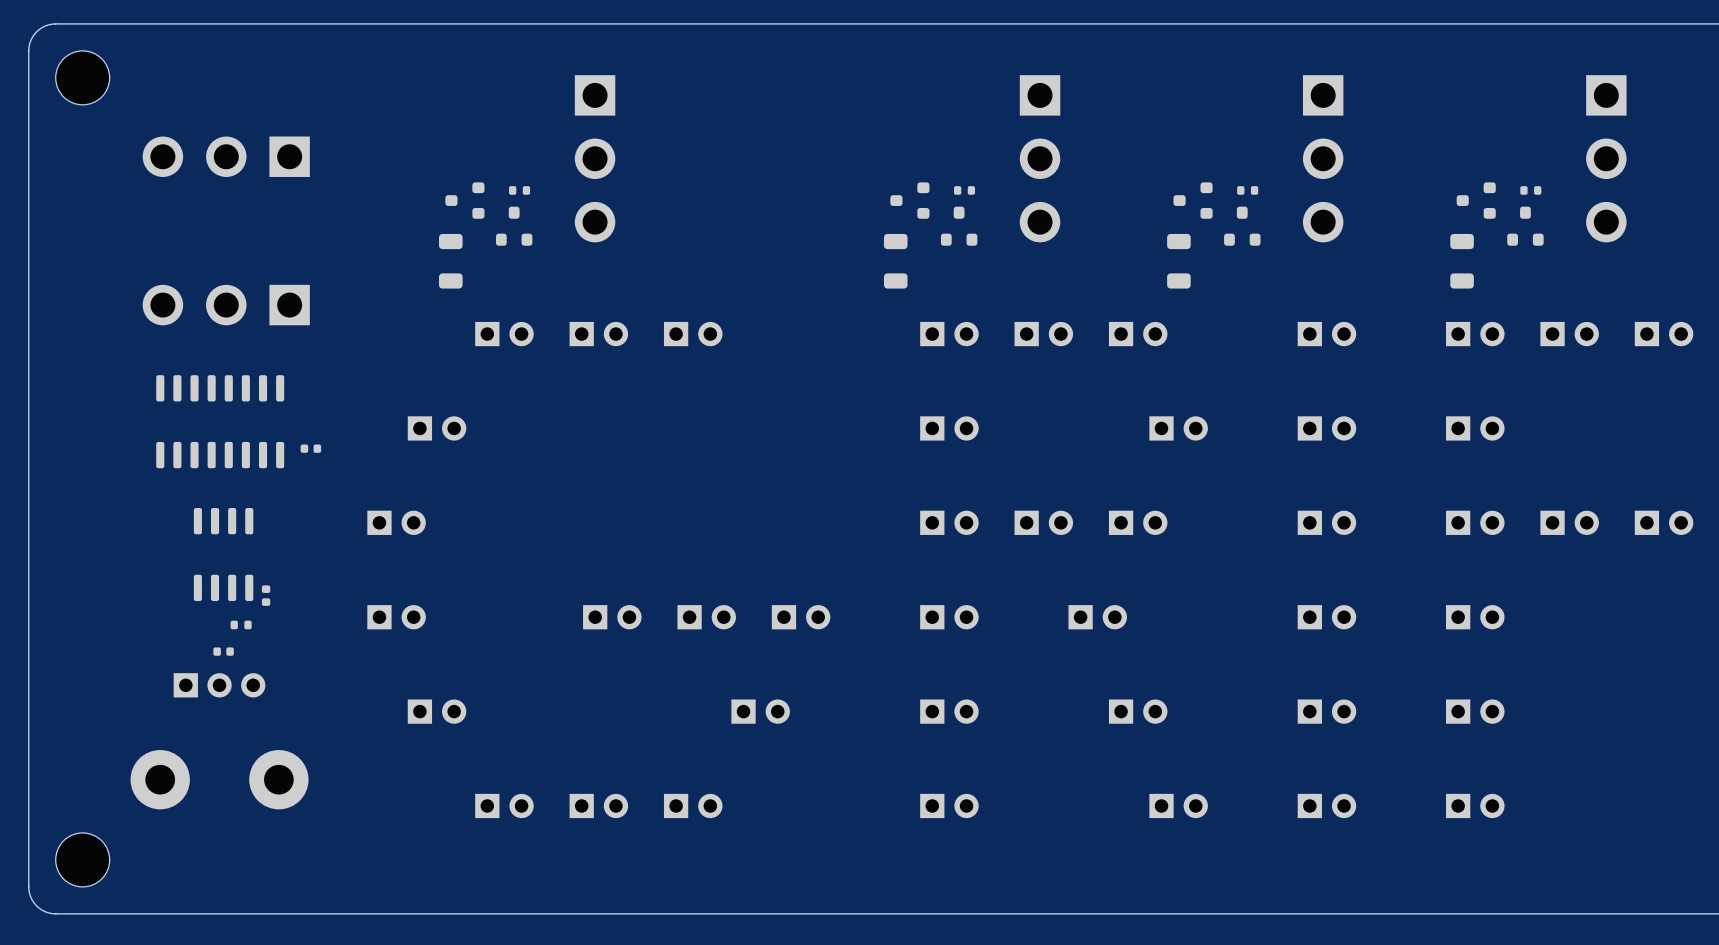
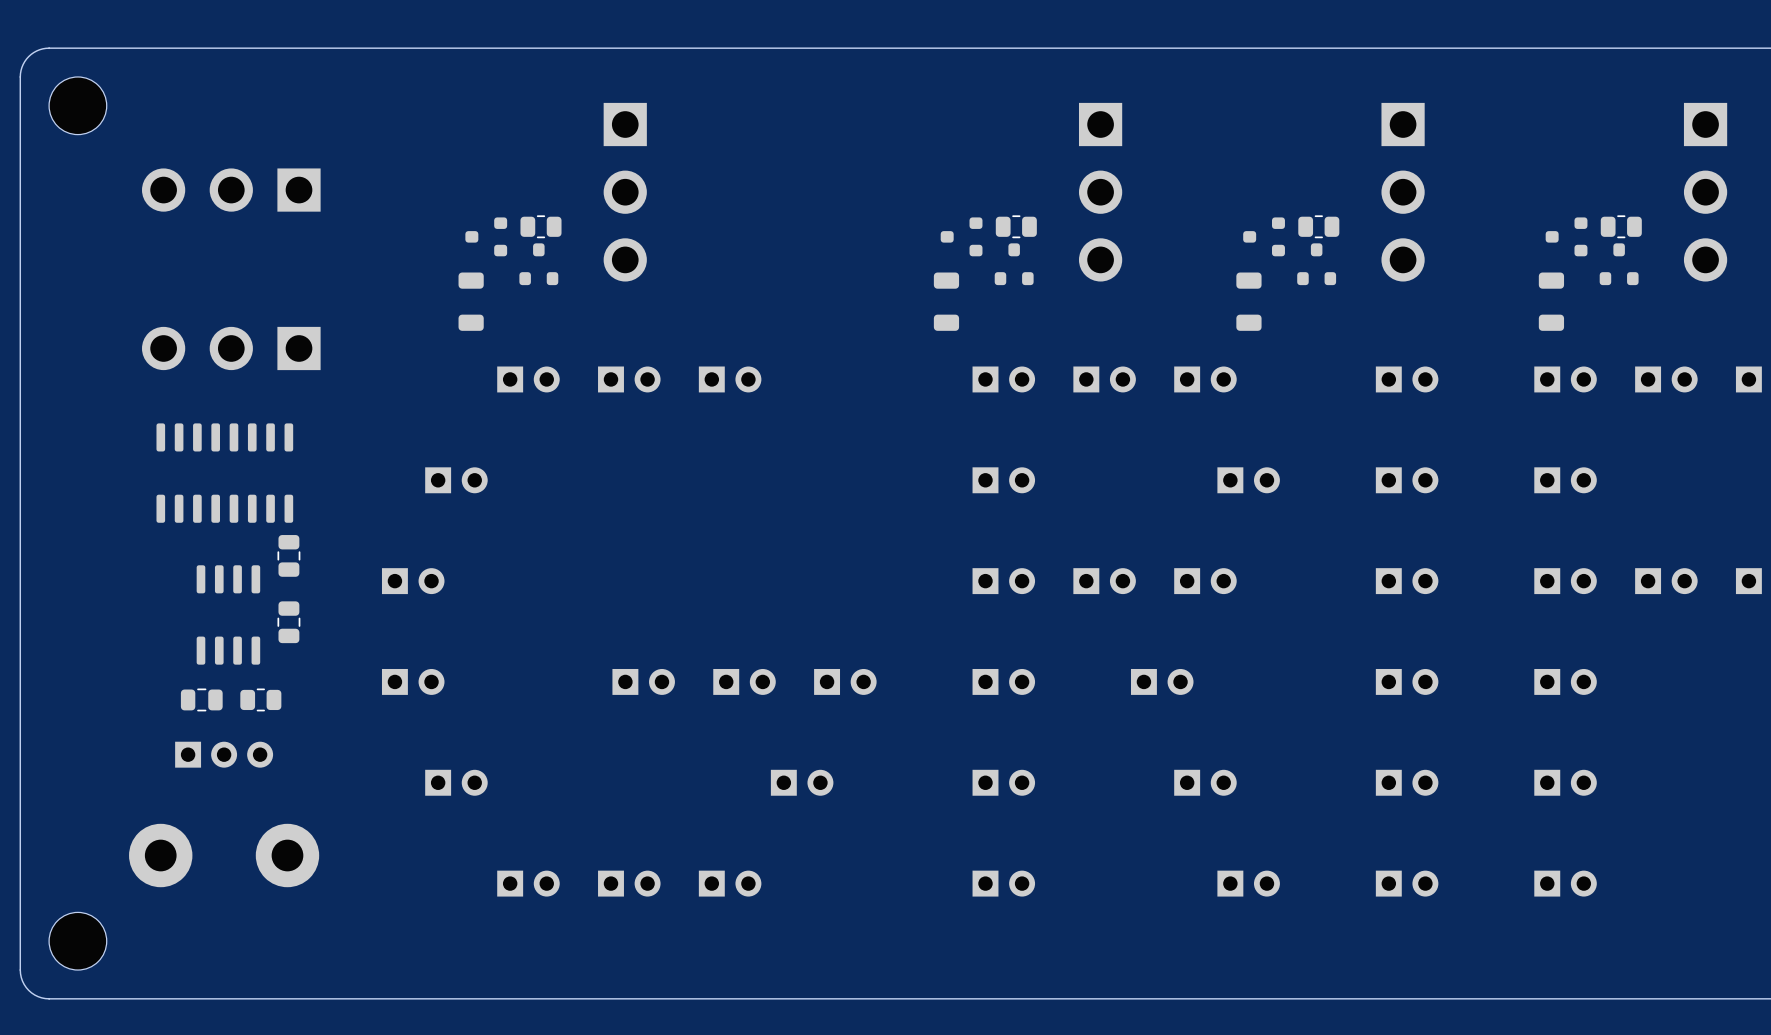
part footprint: [509, 186, 531, 195] -> [520, 215, 562, 239]
part footprint: [954, 186, 976, 195] -> [995, 215, 1037, 239]
part footprint: [1237, 186, 1259, 195] -> [1298, 215, 1340, 239]
part footprint: [1520, 186, 1542, 195] -> [1600, 215, 1642, 239]
part: (310, 448) -> none
part: none -> (288, 555)
part: none -> (288, 622)
part: (266, 595) -> none
part: (241, 624) -> none
part: none -> (201, 699)
part: none -> (260, 699)
part: (223, 651) -> none

